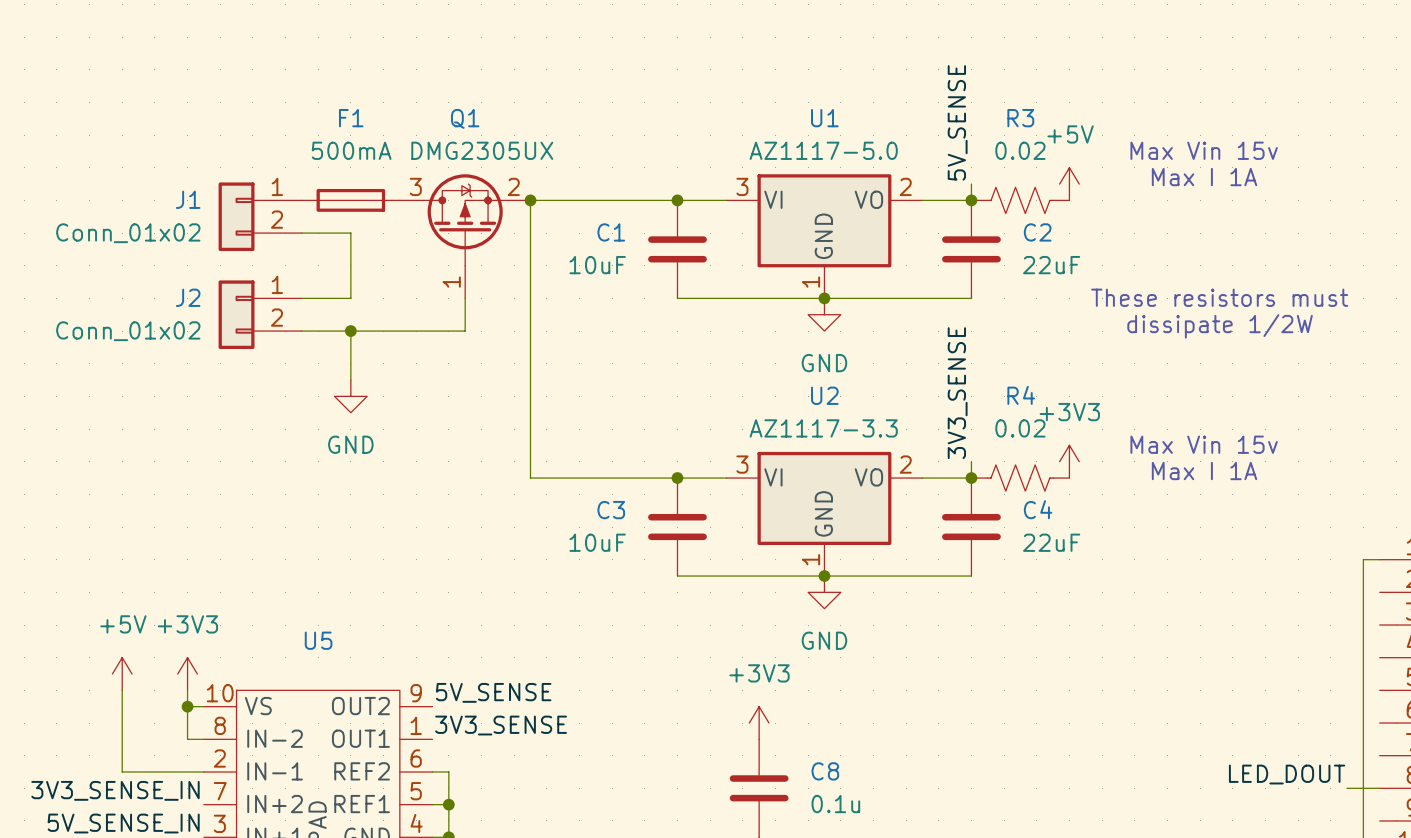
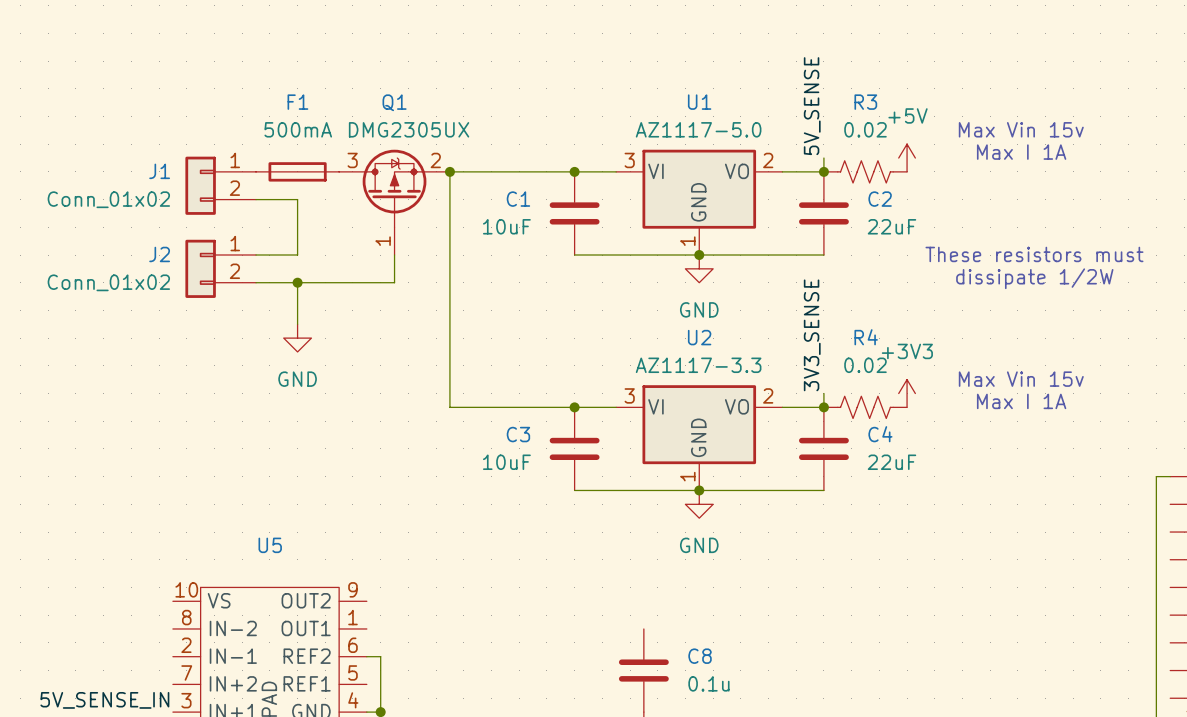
power symbol: +5V (122, 674) -> none
power symbol: +3V3 (187, 674) -> none
wire: (122, 690) (122, 771) (203, 771) -> none
wire: (187, 690) (187, 739) (203, 739) -> none
label: 5V_SENSE (493, 692) -> none
wire: (187, 706) (203, 706) -> none
junction: (187, 706) -> none
power symbol: +3V3 (759, 723) -> none
label: 3V3_SENSE (501, 725) -> none
label: LED_DOUT (1287, 774) -> none
wire: (1347, 788) (1379, 788) -> none
label: 3V3_SENSE_IN (115, 790) -> none
wire: (432, 804) (448, 804) -> none
junction: (448, 804) -> none

